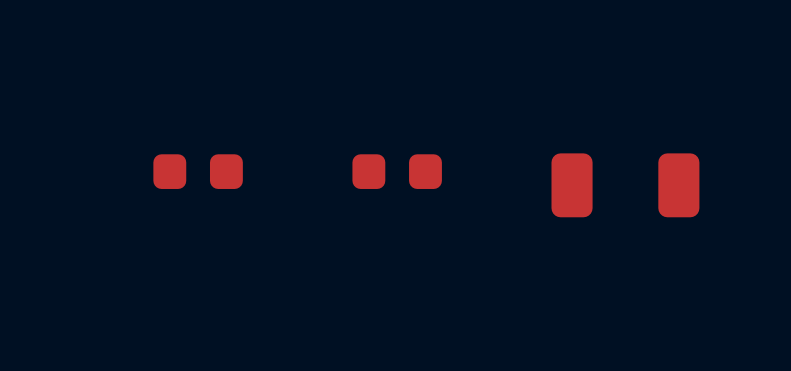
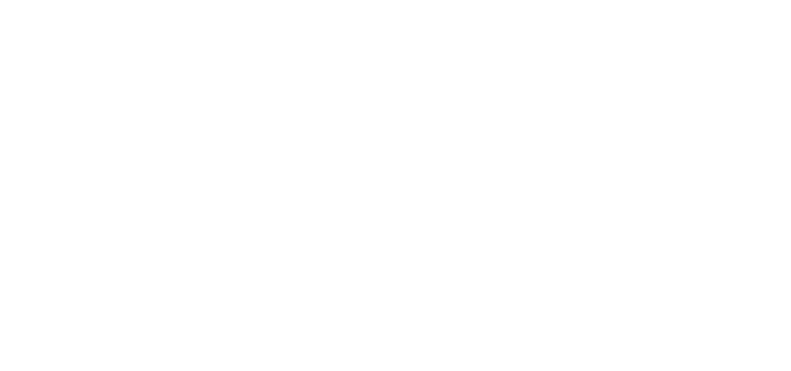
part: (198, 171) -> none
part: (397, 171) -> none
part: (625, 185) -> none

